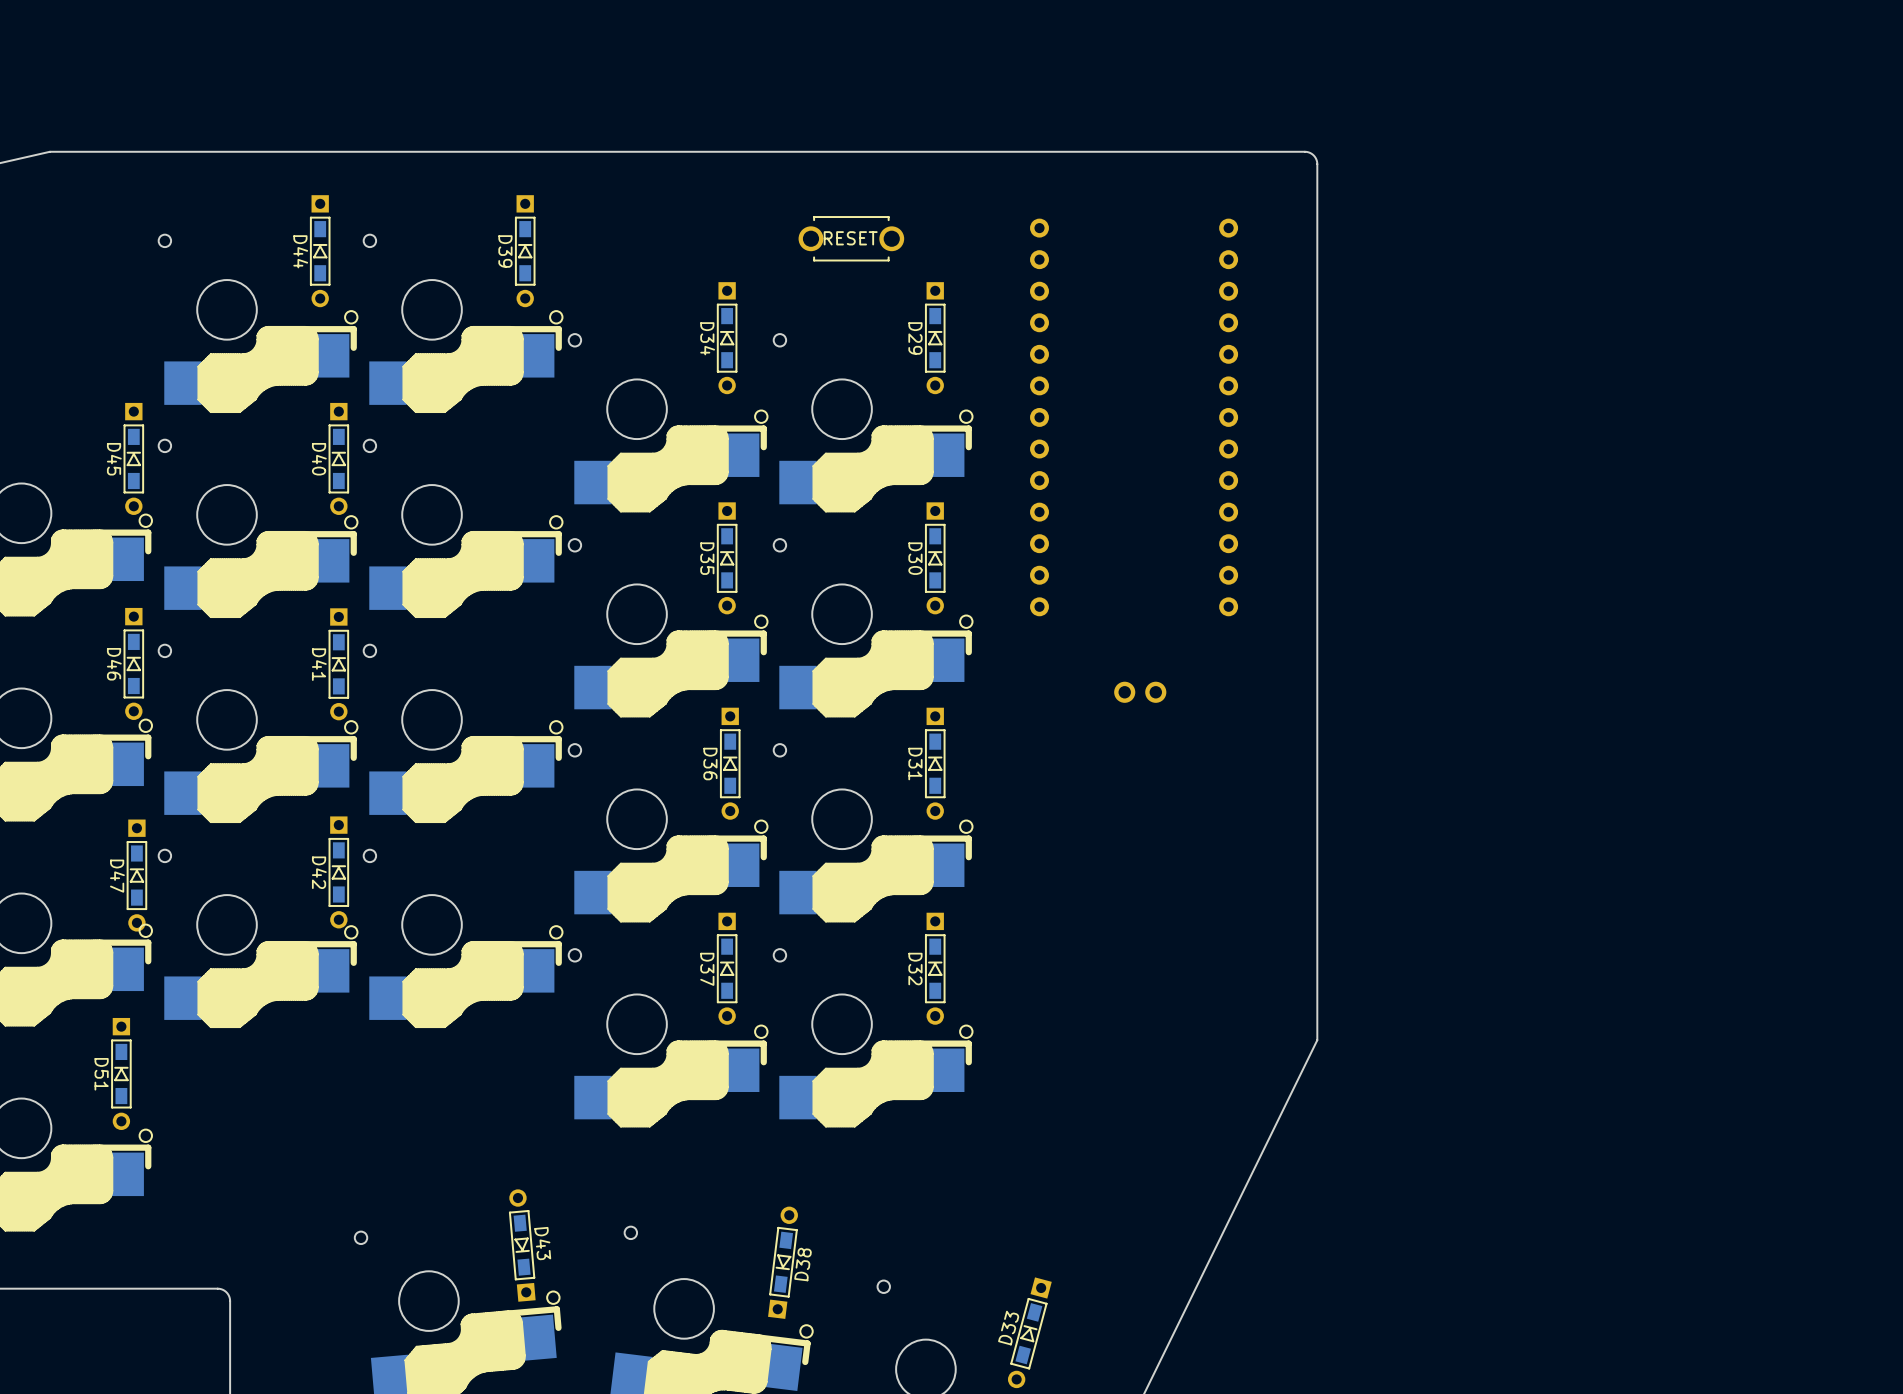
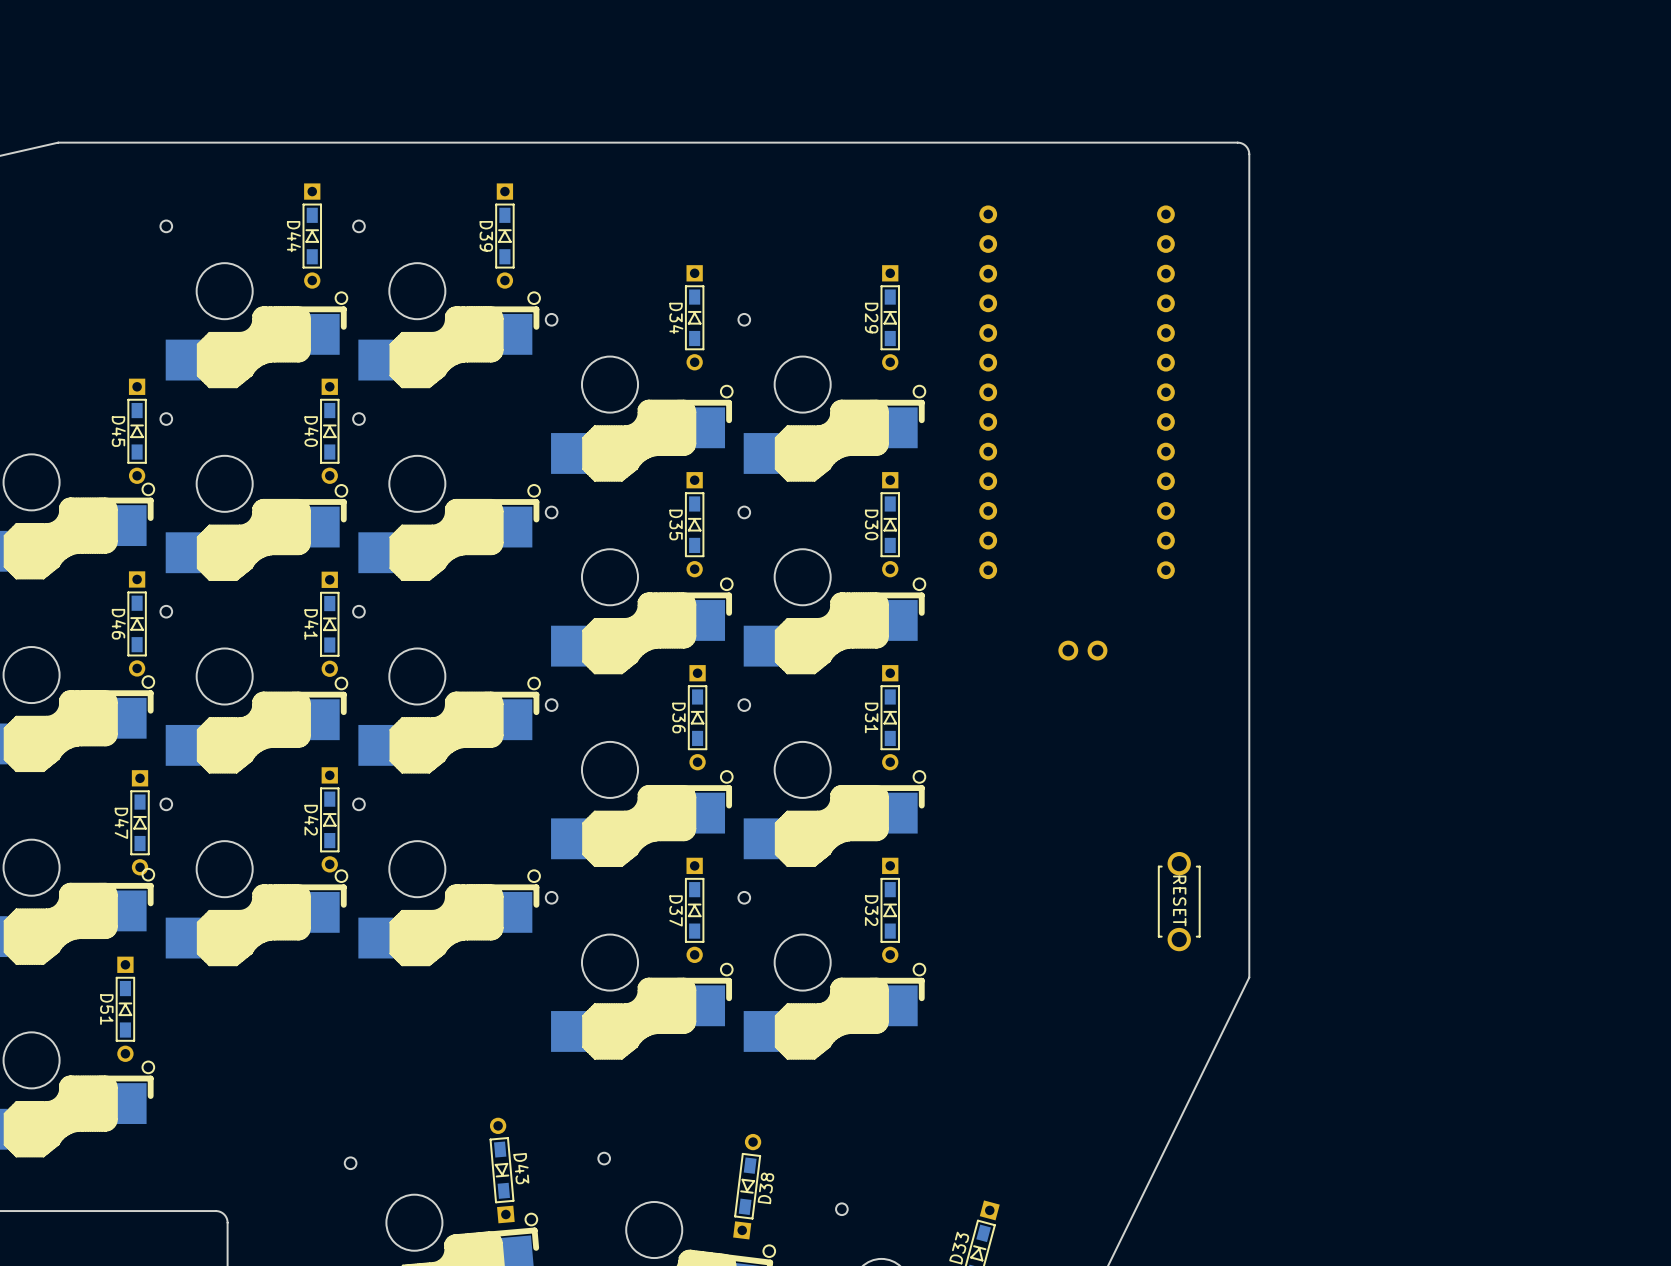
part: (851, 238) -> none
part: none -> (1179, 901)

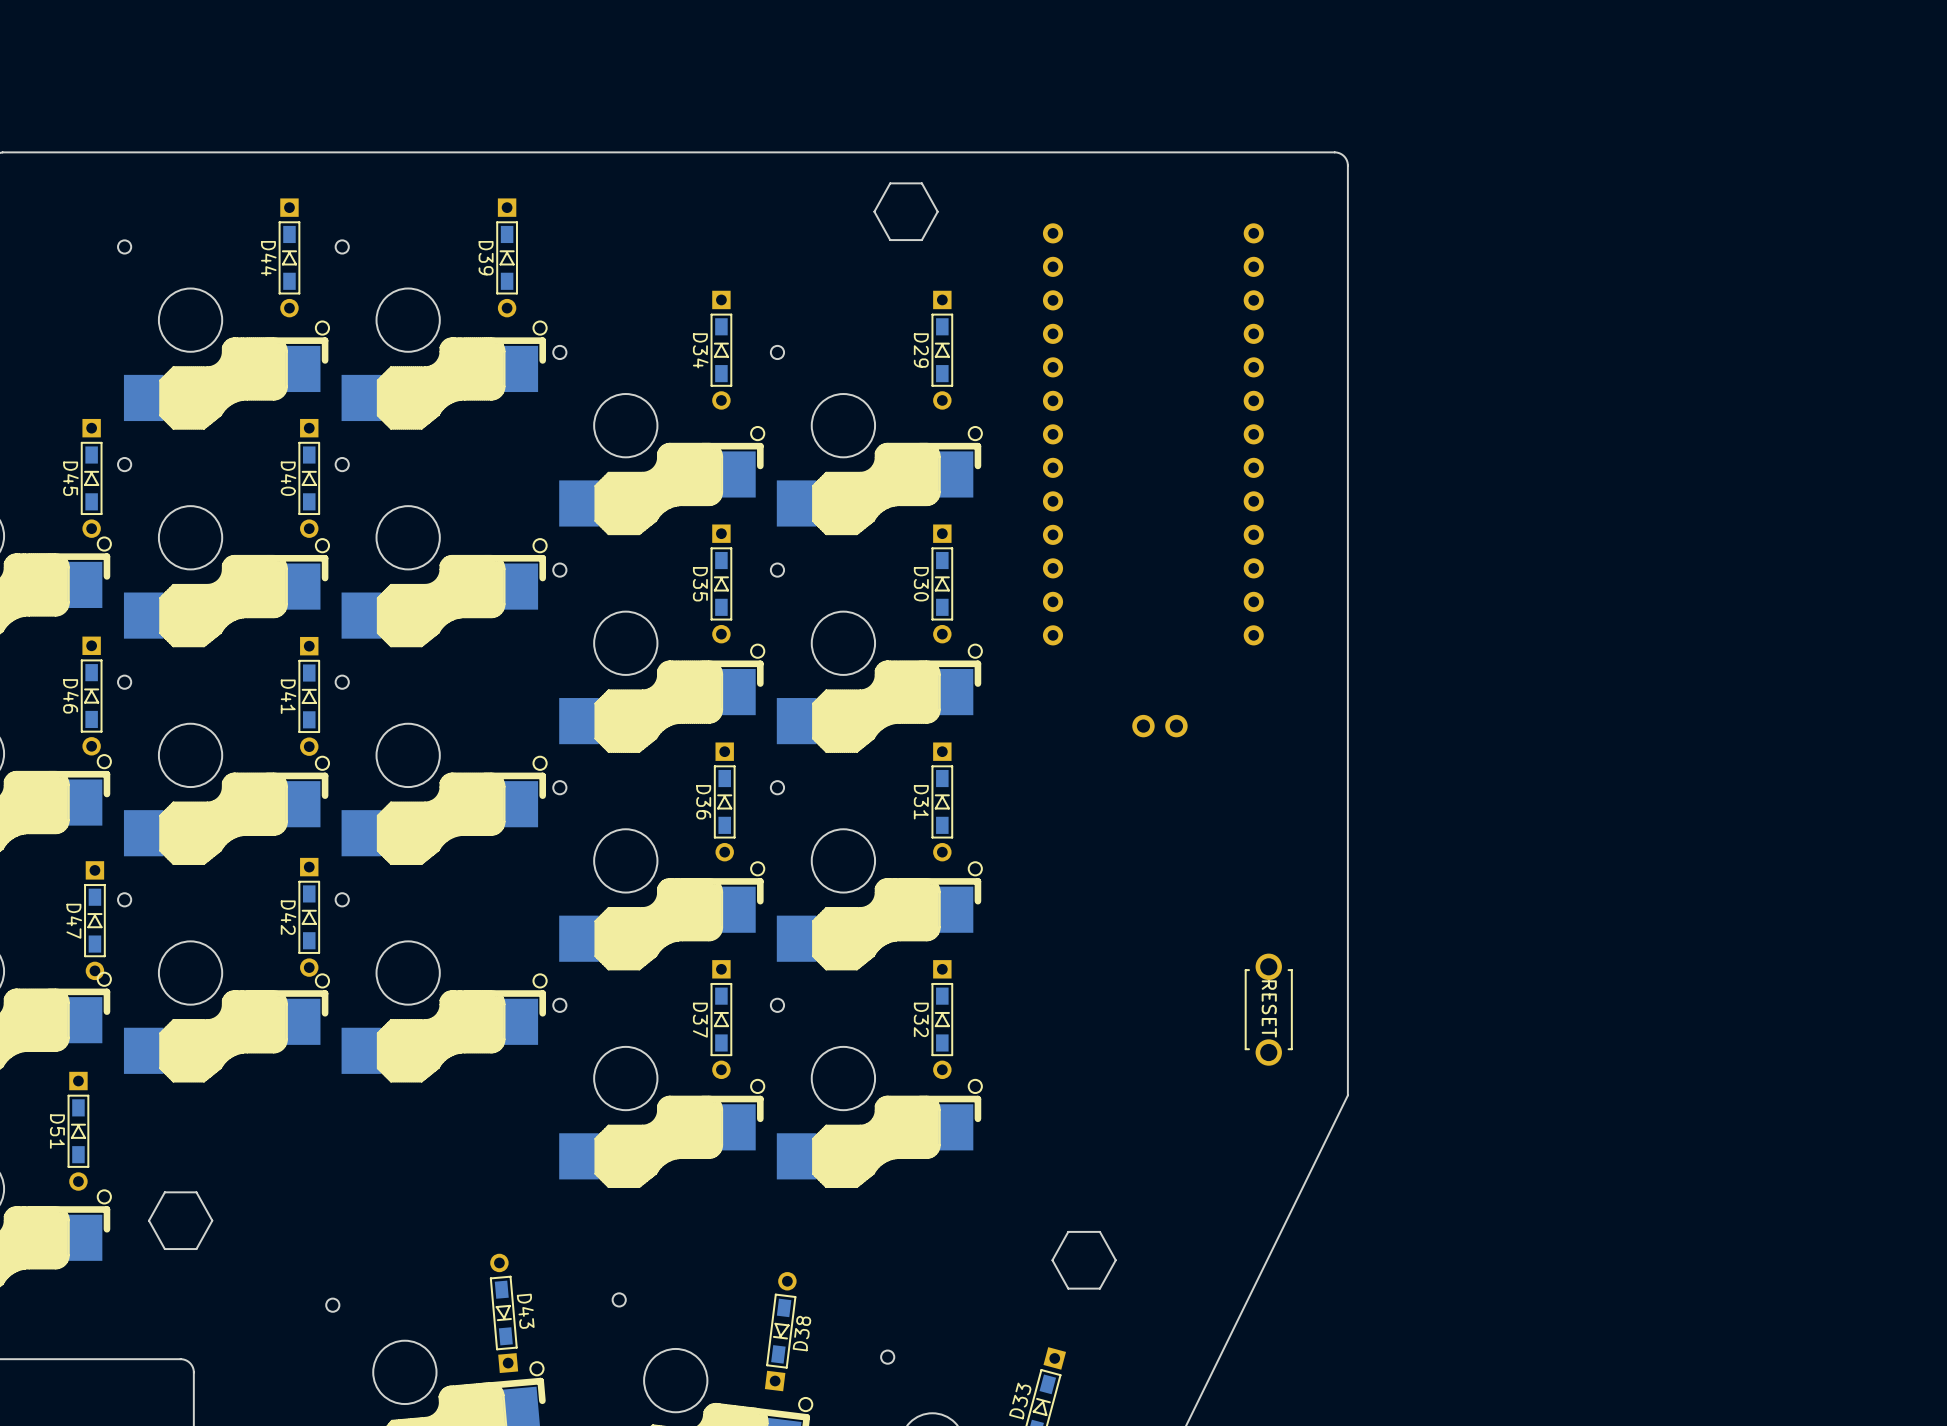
drawing: none -> [873, 182, 939, 241]
drawing: none -> [148, 1191, 213, 1250]
drawing: none -> [1051, 1231, 1117, 1290]

